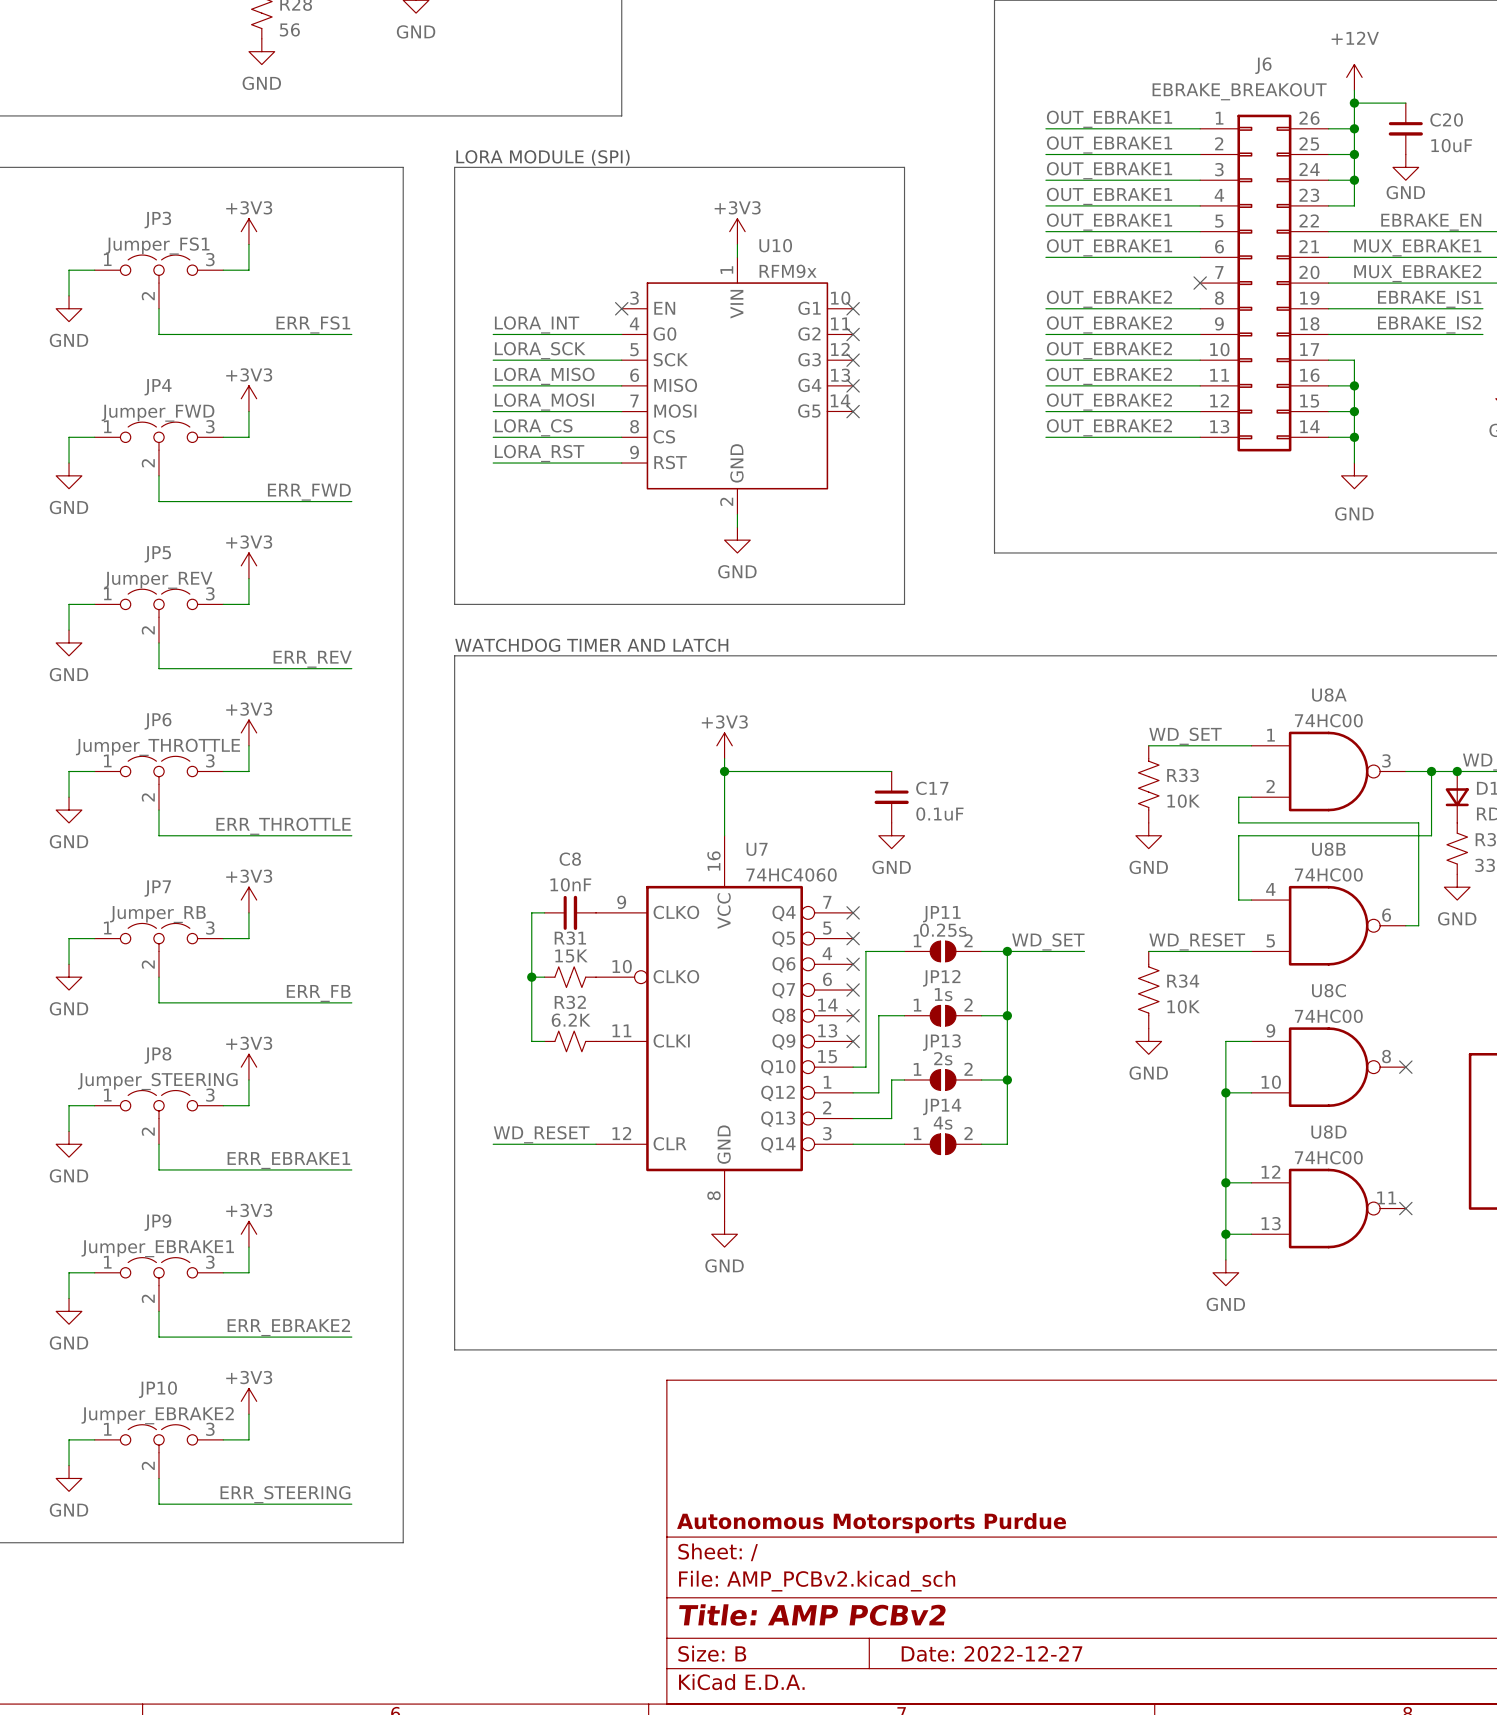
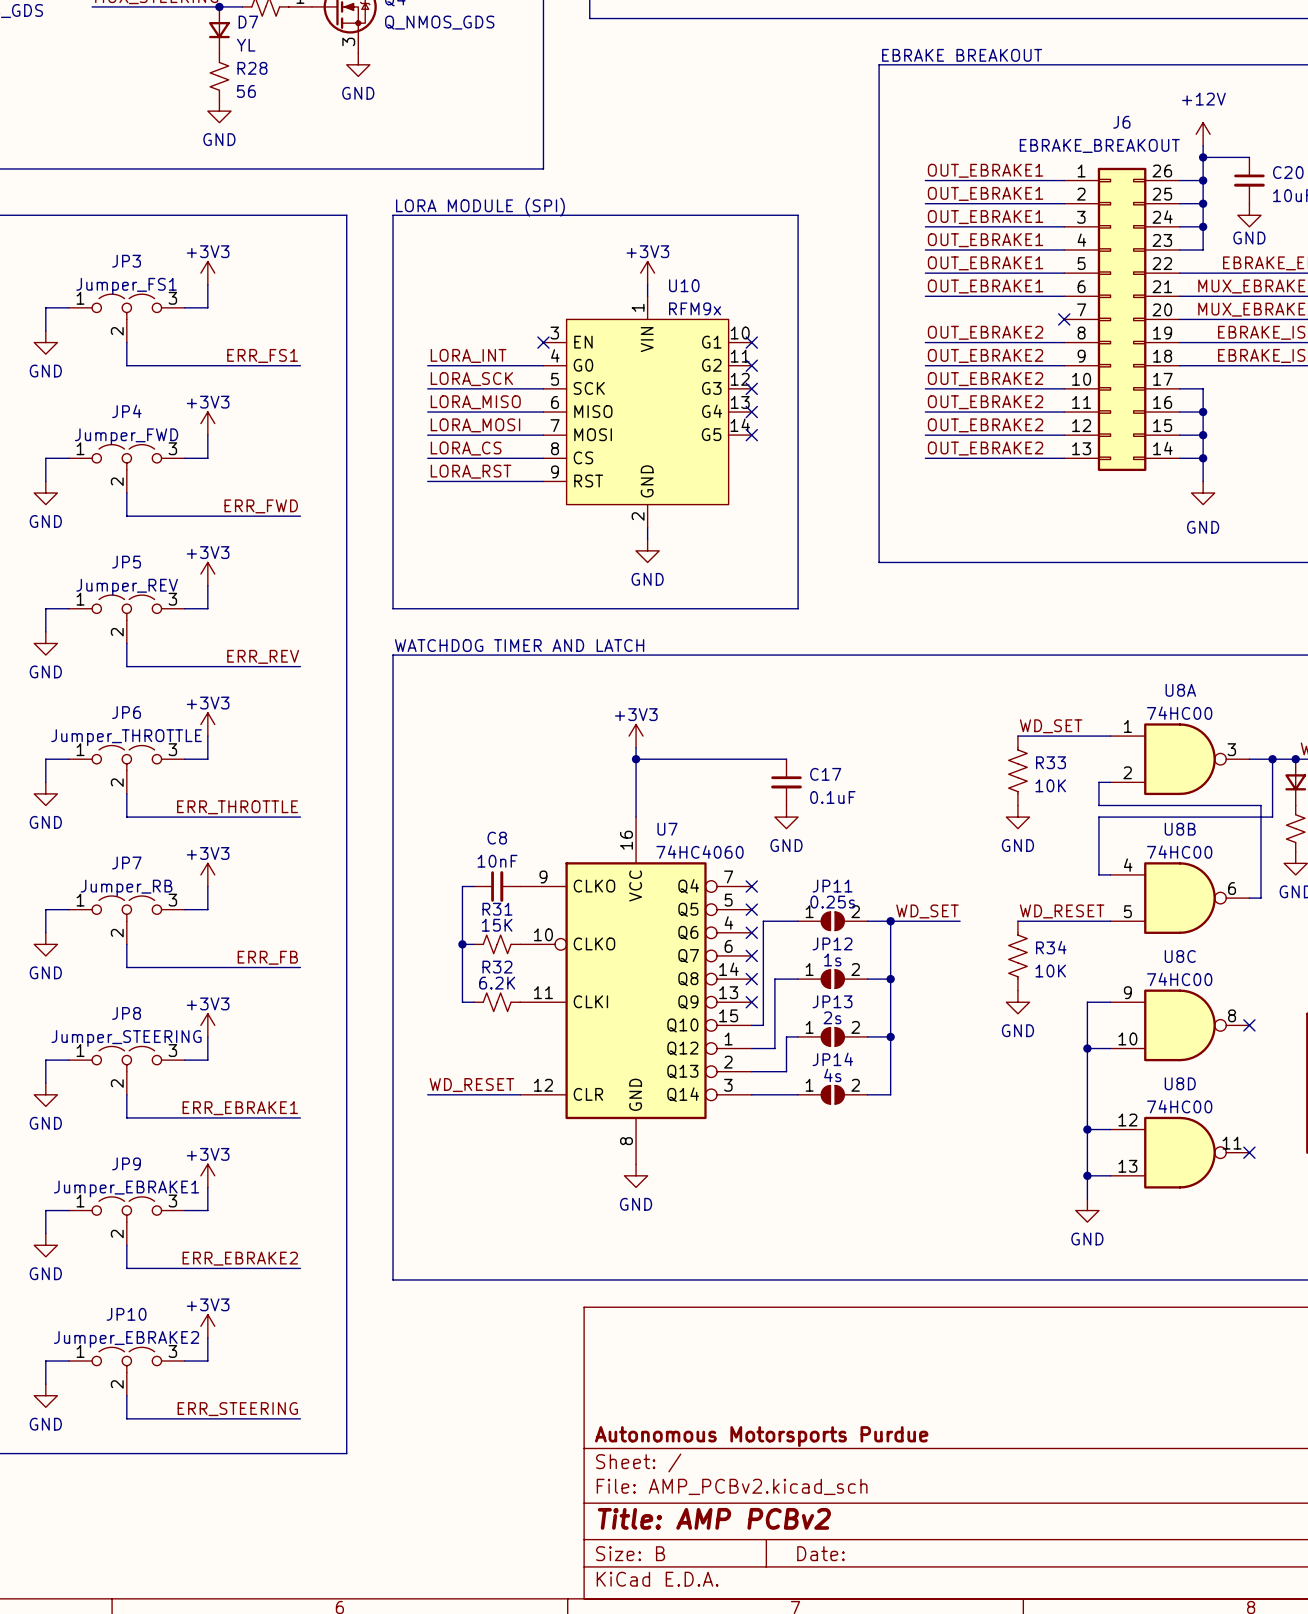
title block: Date: 2022-12-27 (992, 1653) -> Date: (820, 1553)

